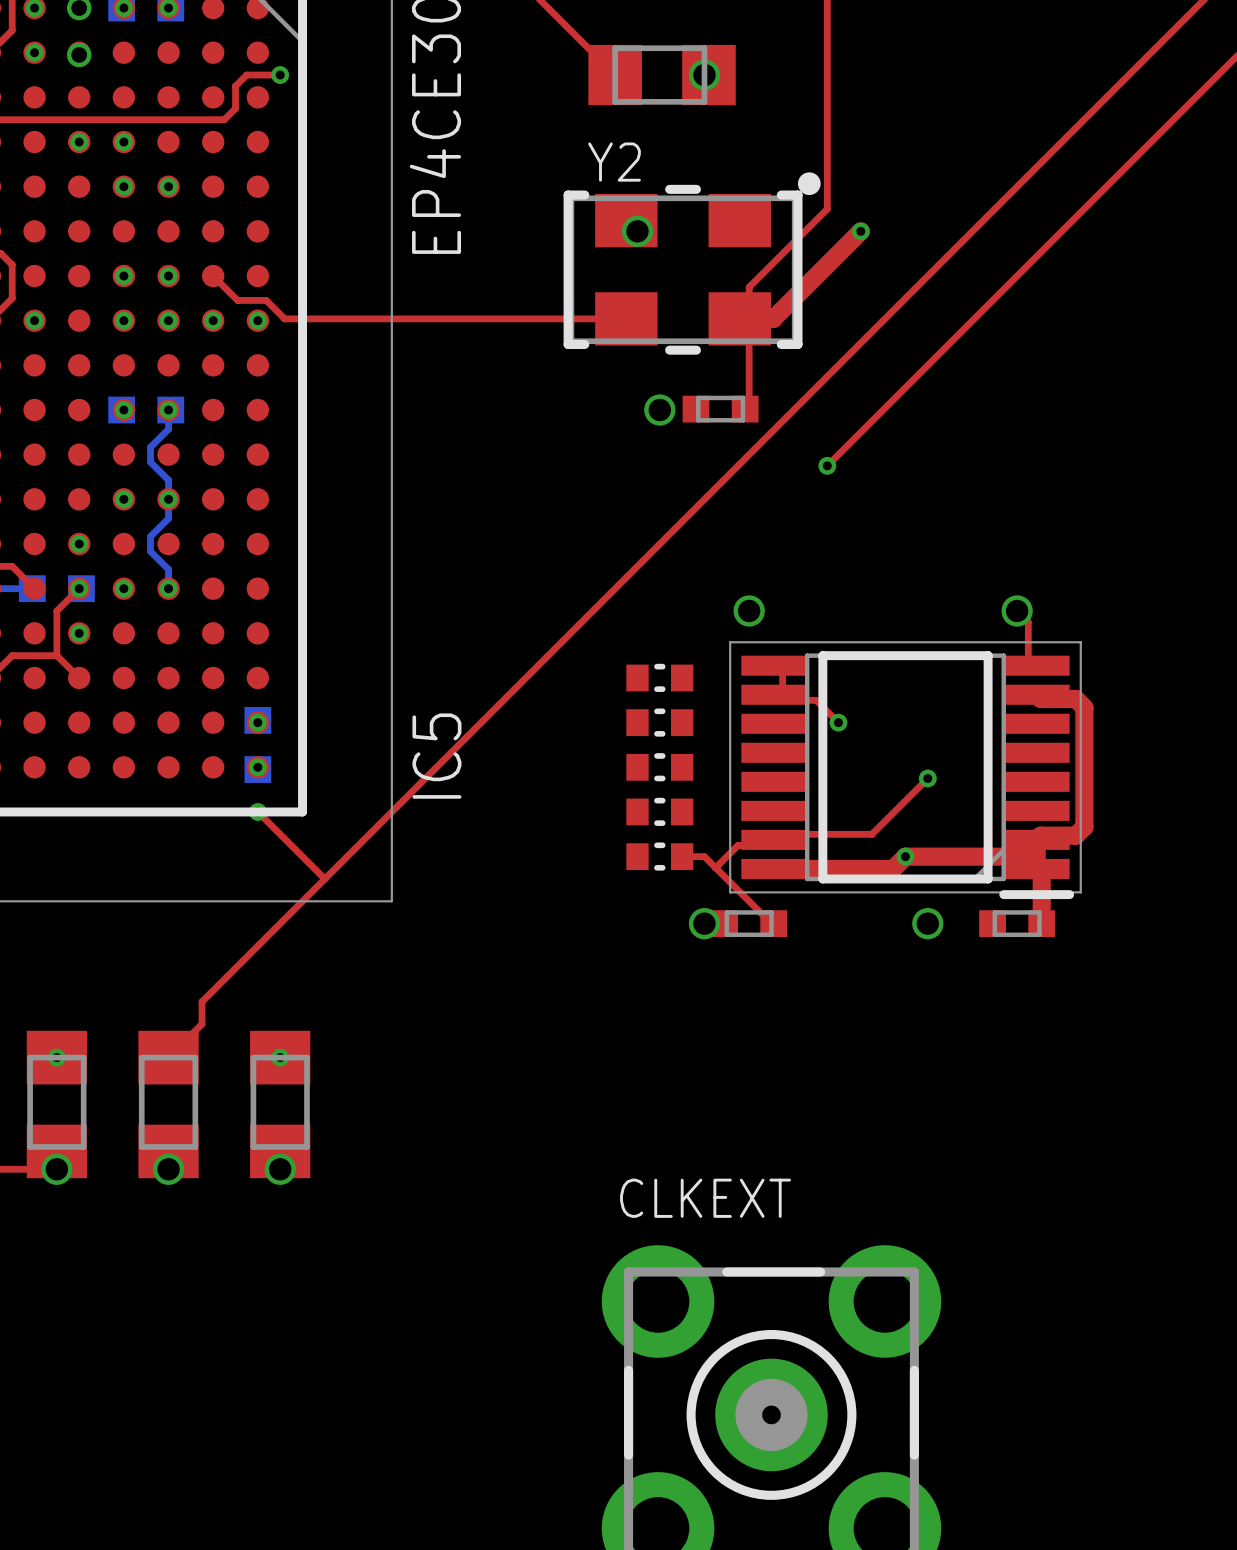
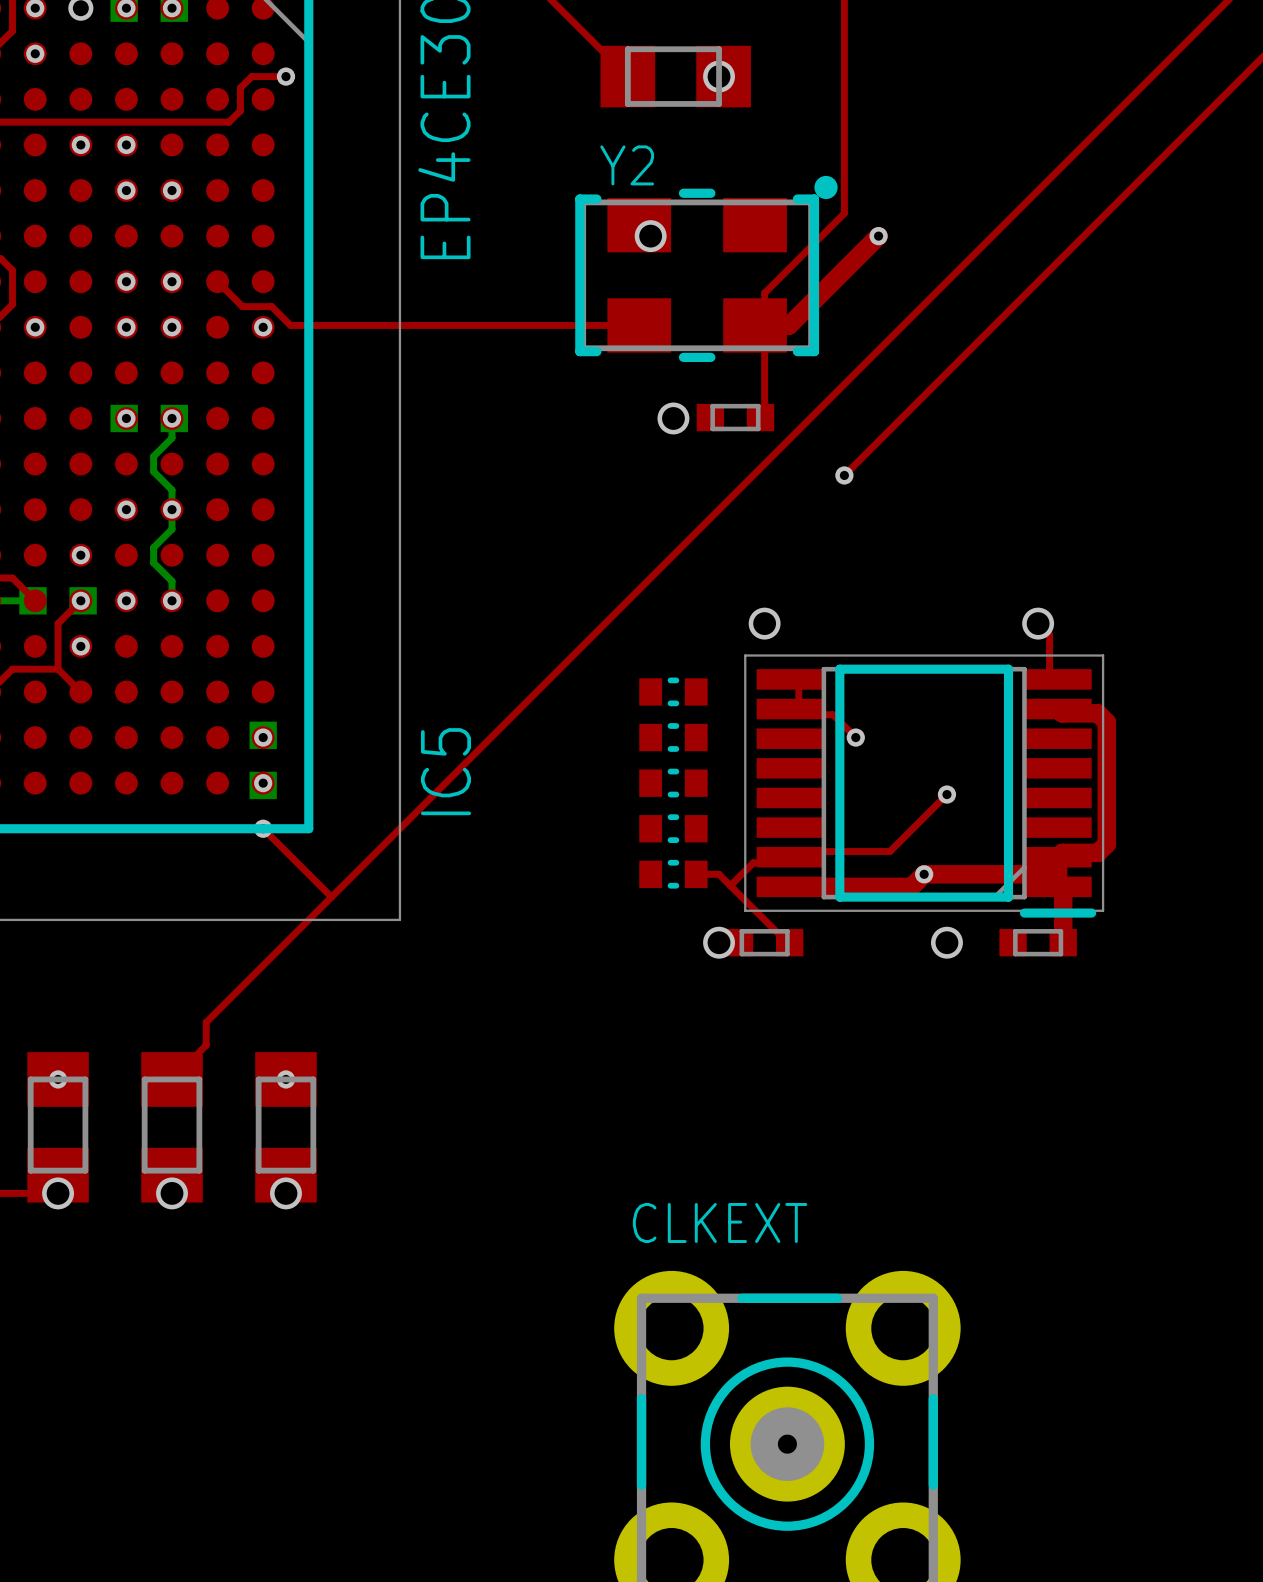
via: (79, 54) -> none
via: (213, 320) -> none

